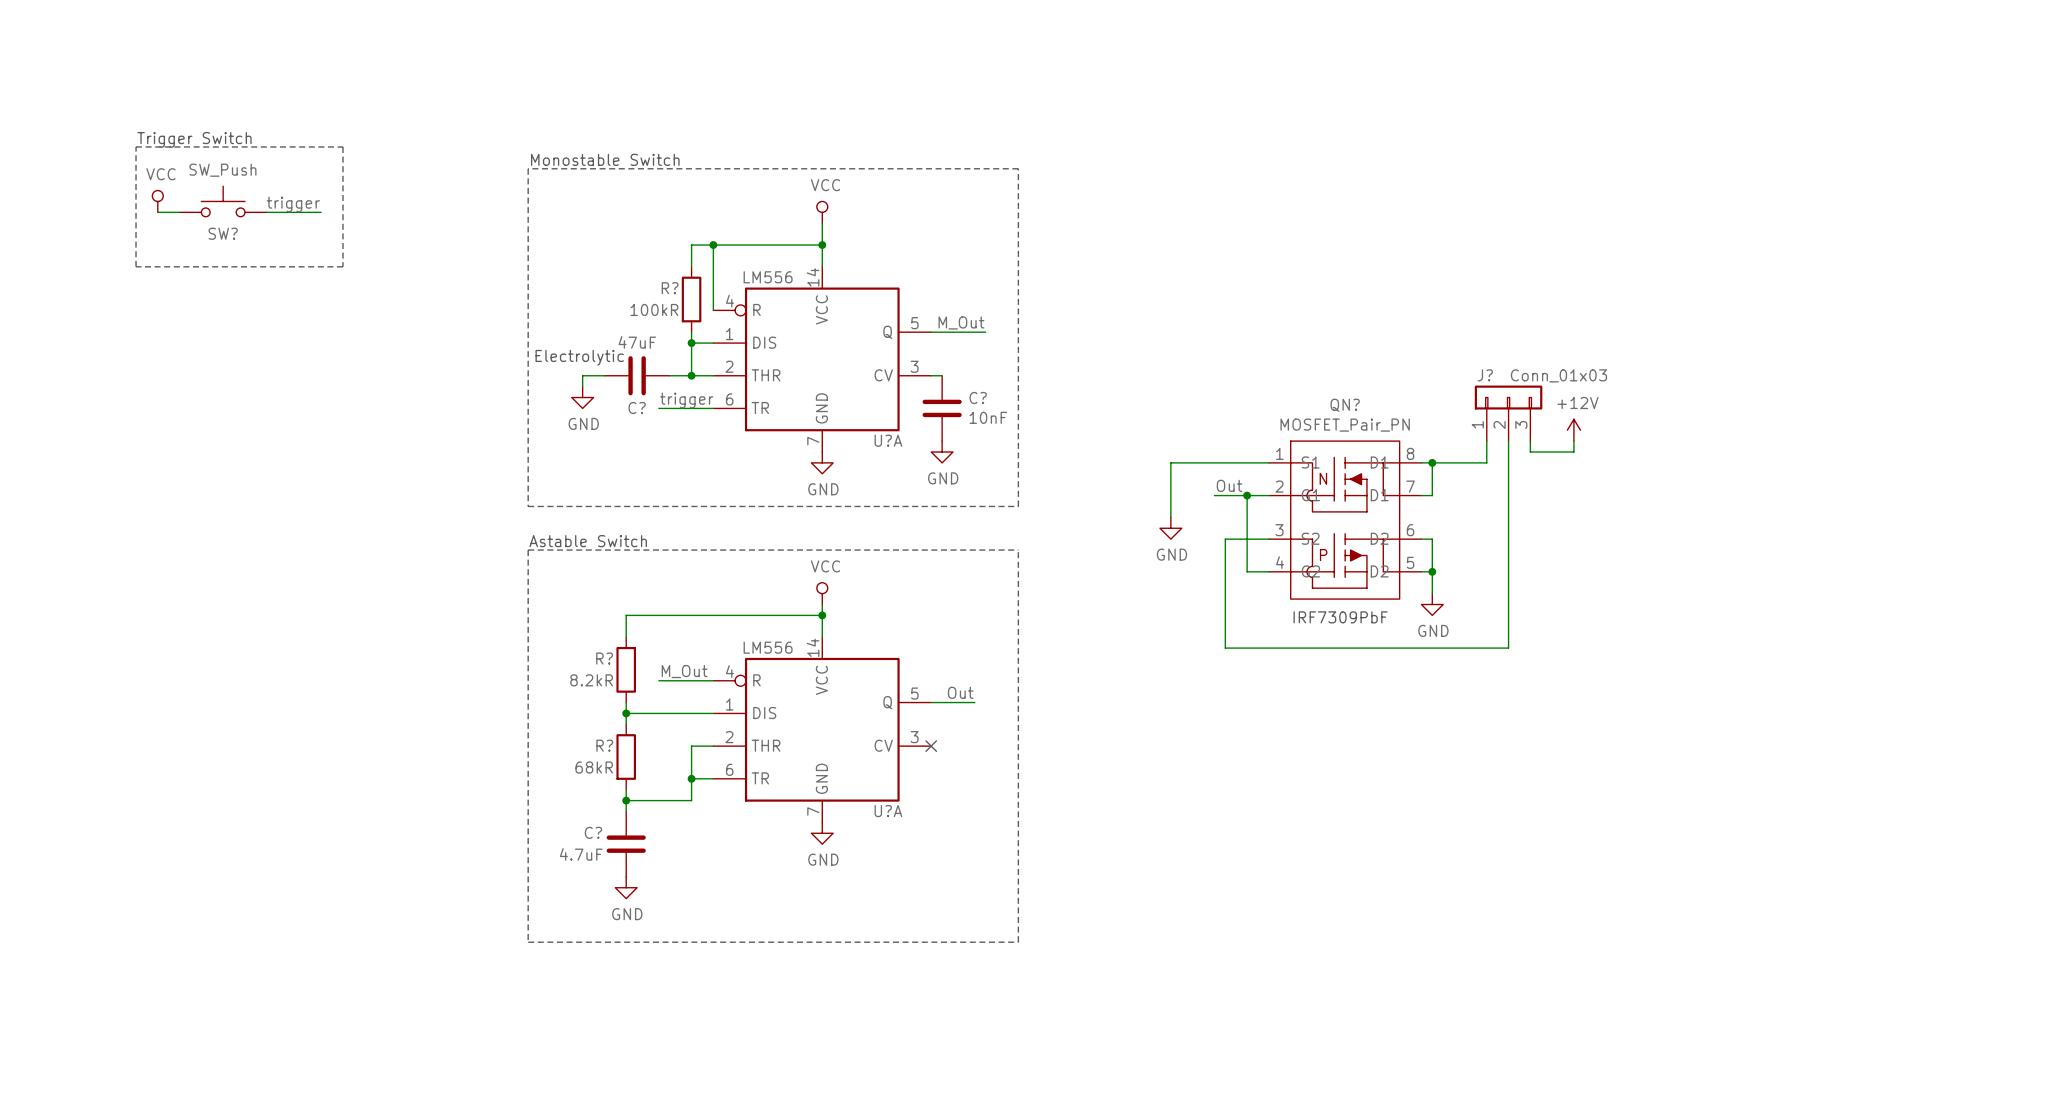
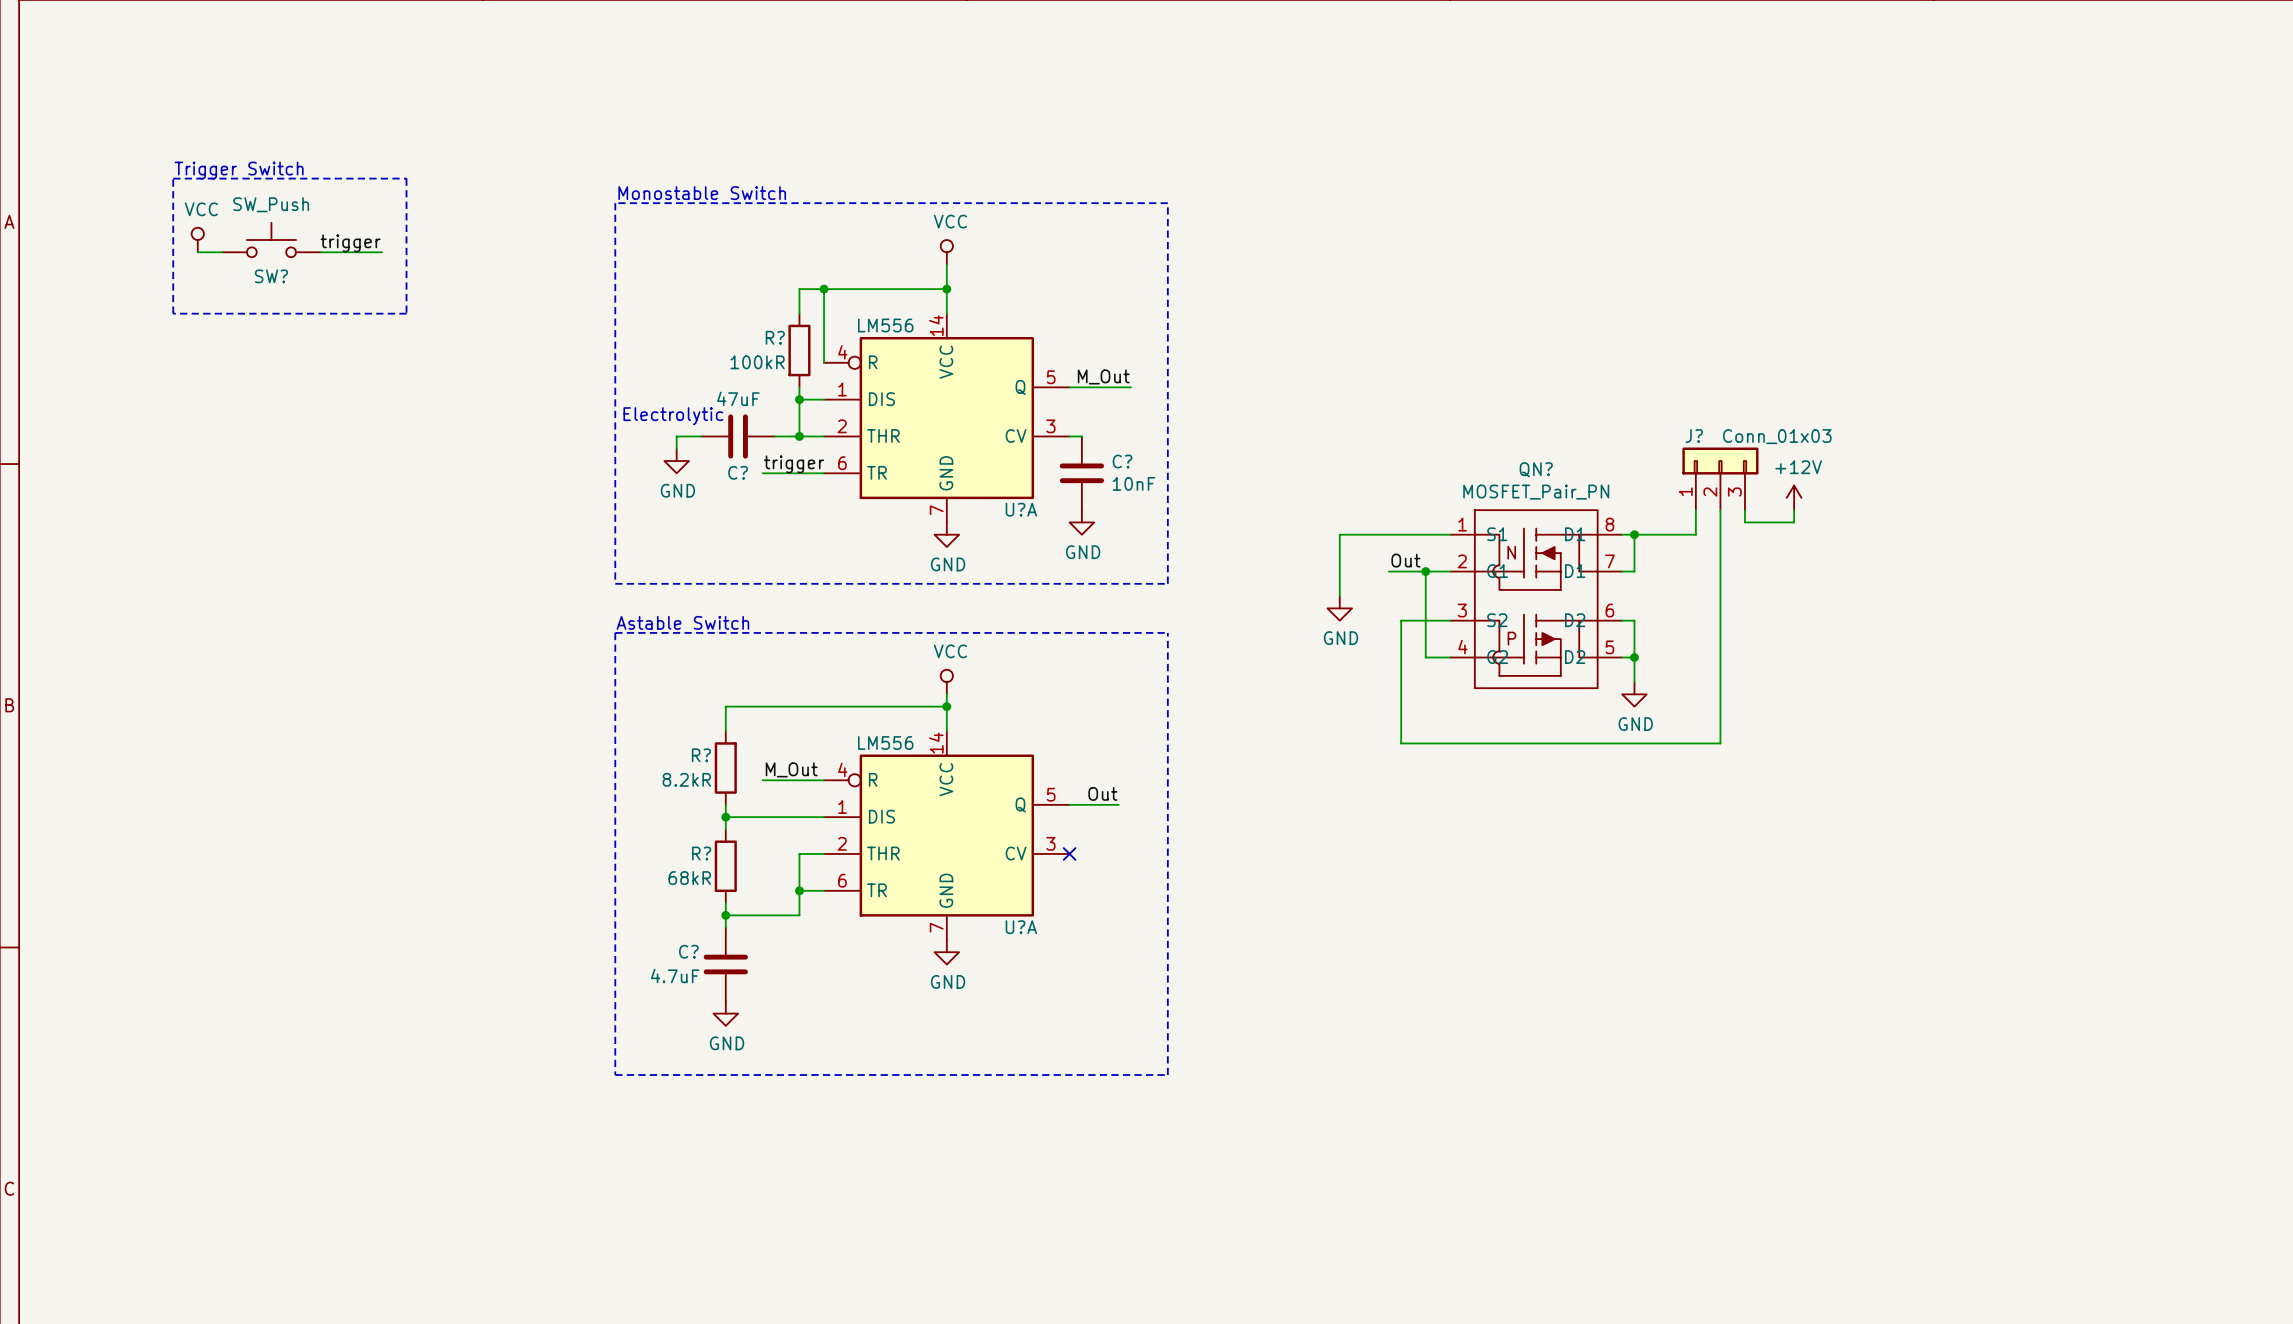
text: IRF7309PbF (1340, 617) -> none

